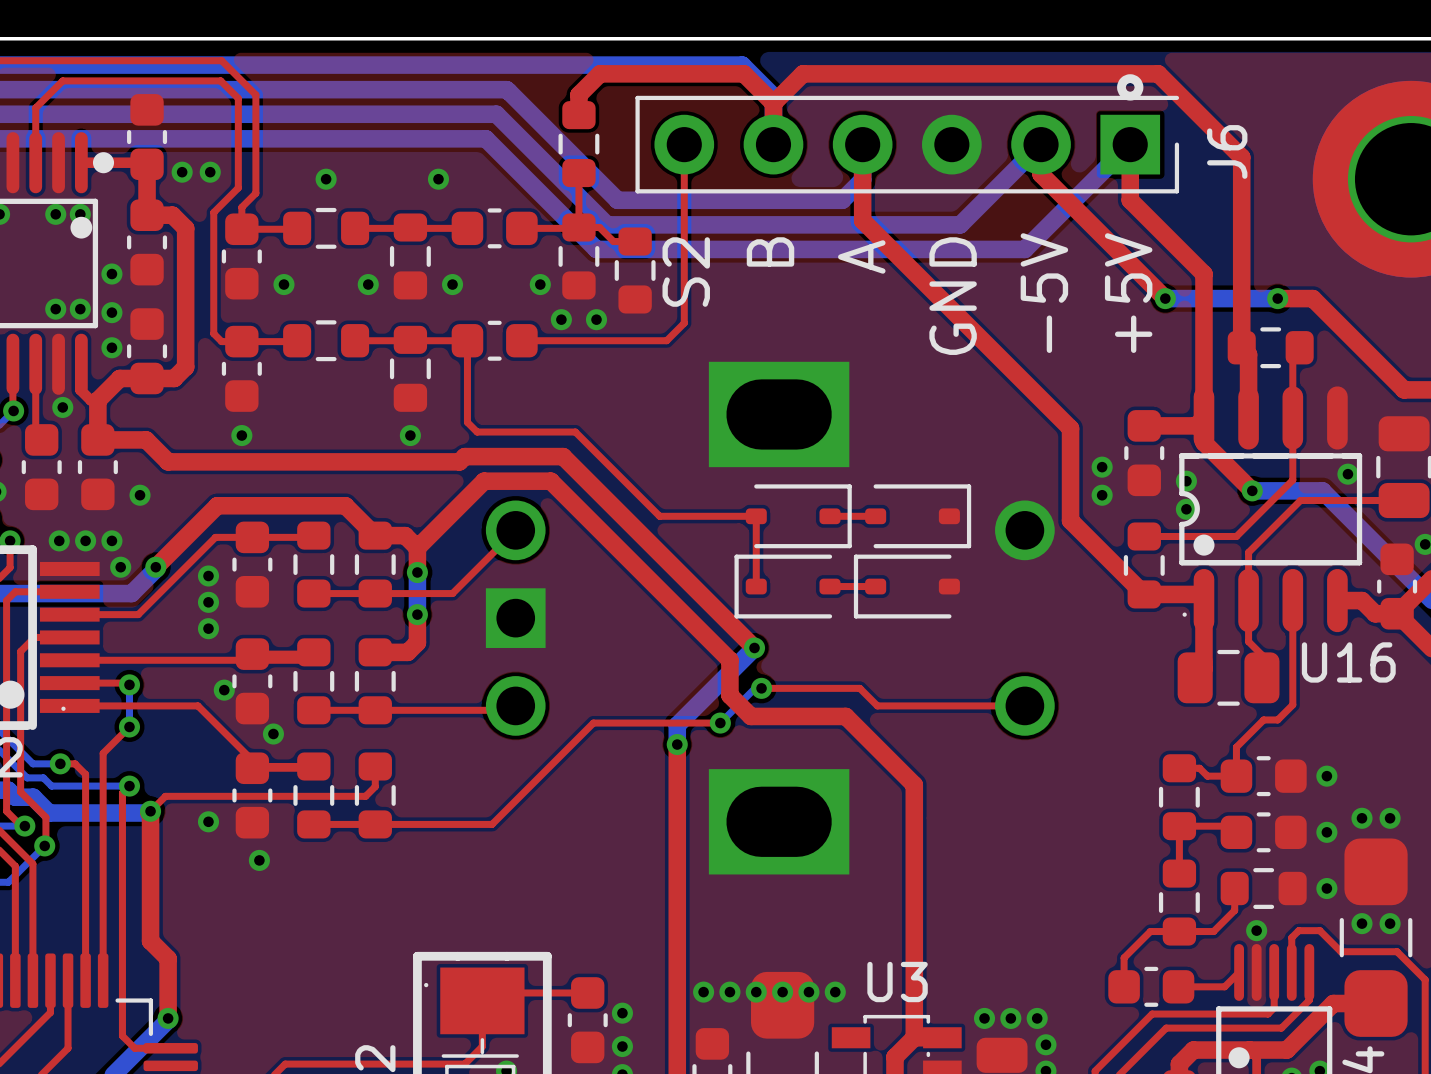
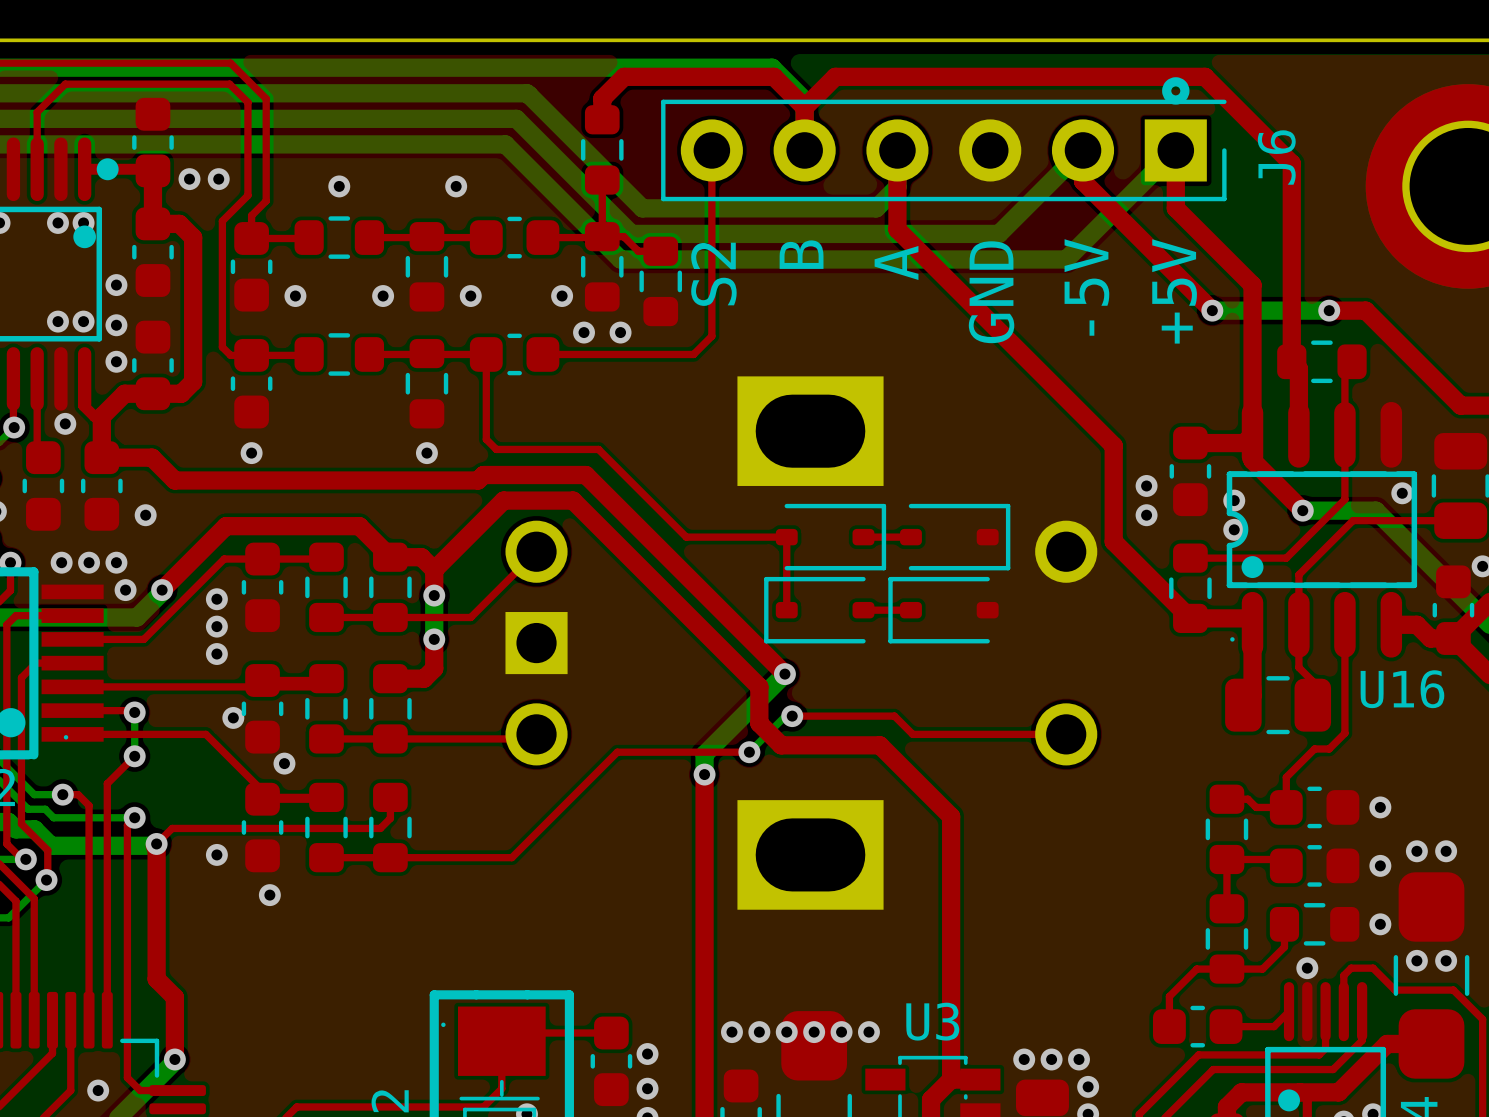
via: none -> (98, 1090)

